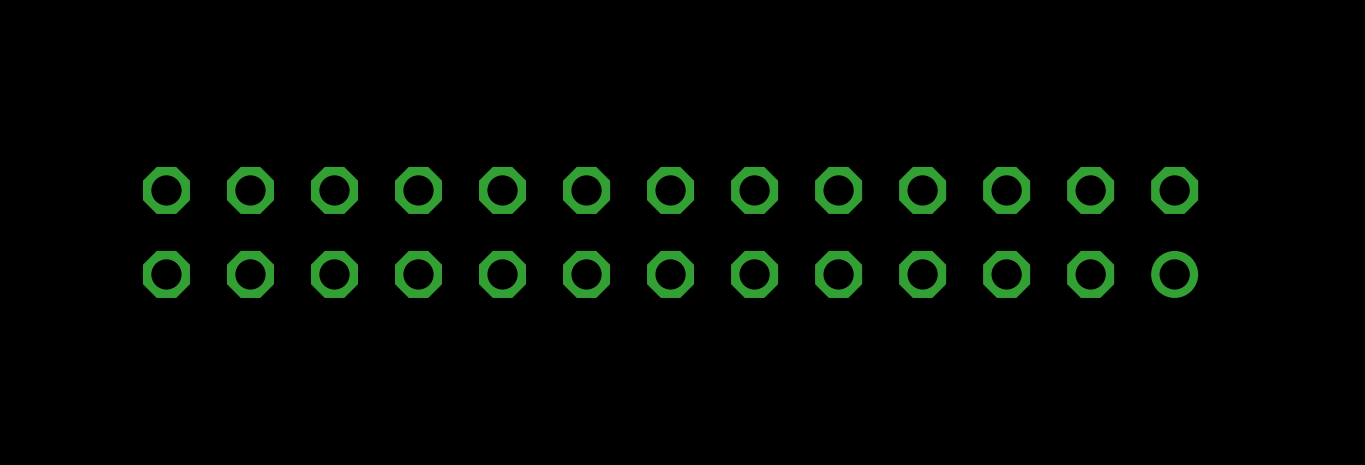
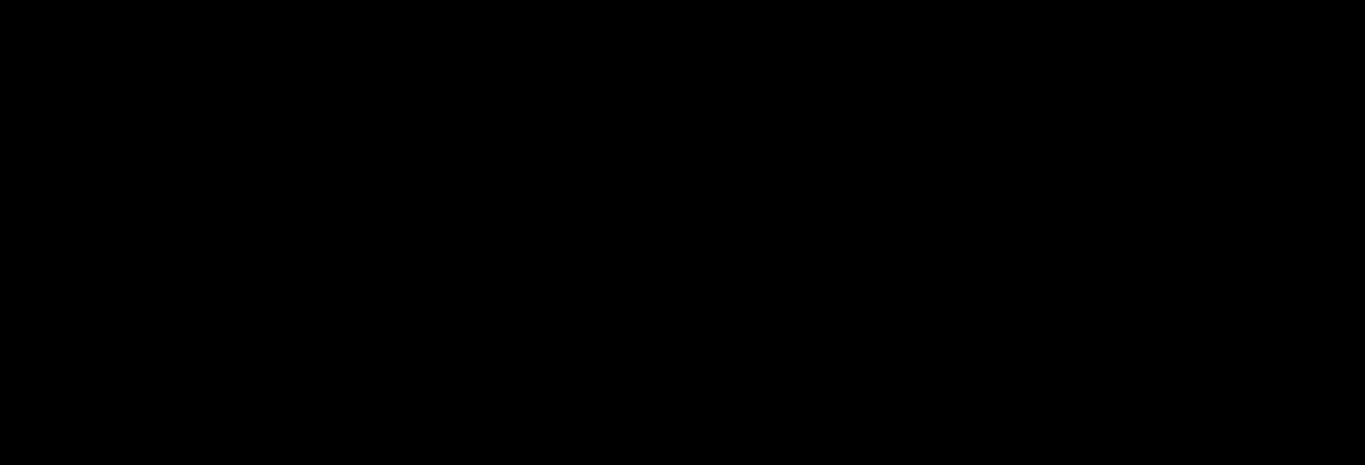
part: (670, 232) -> none

